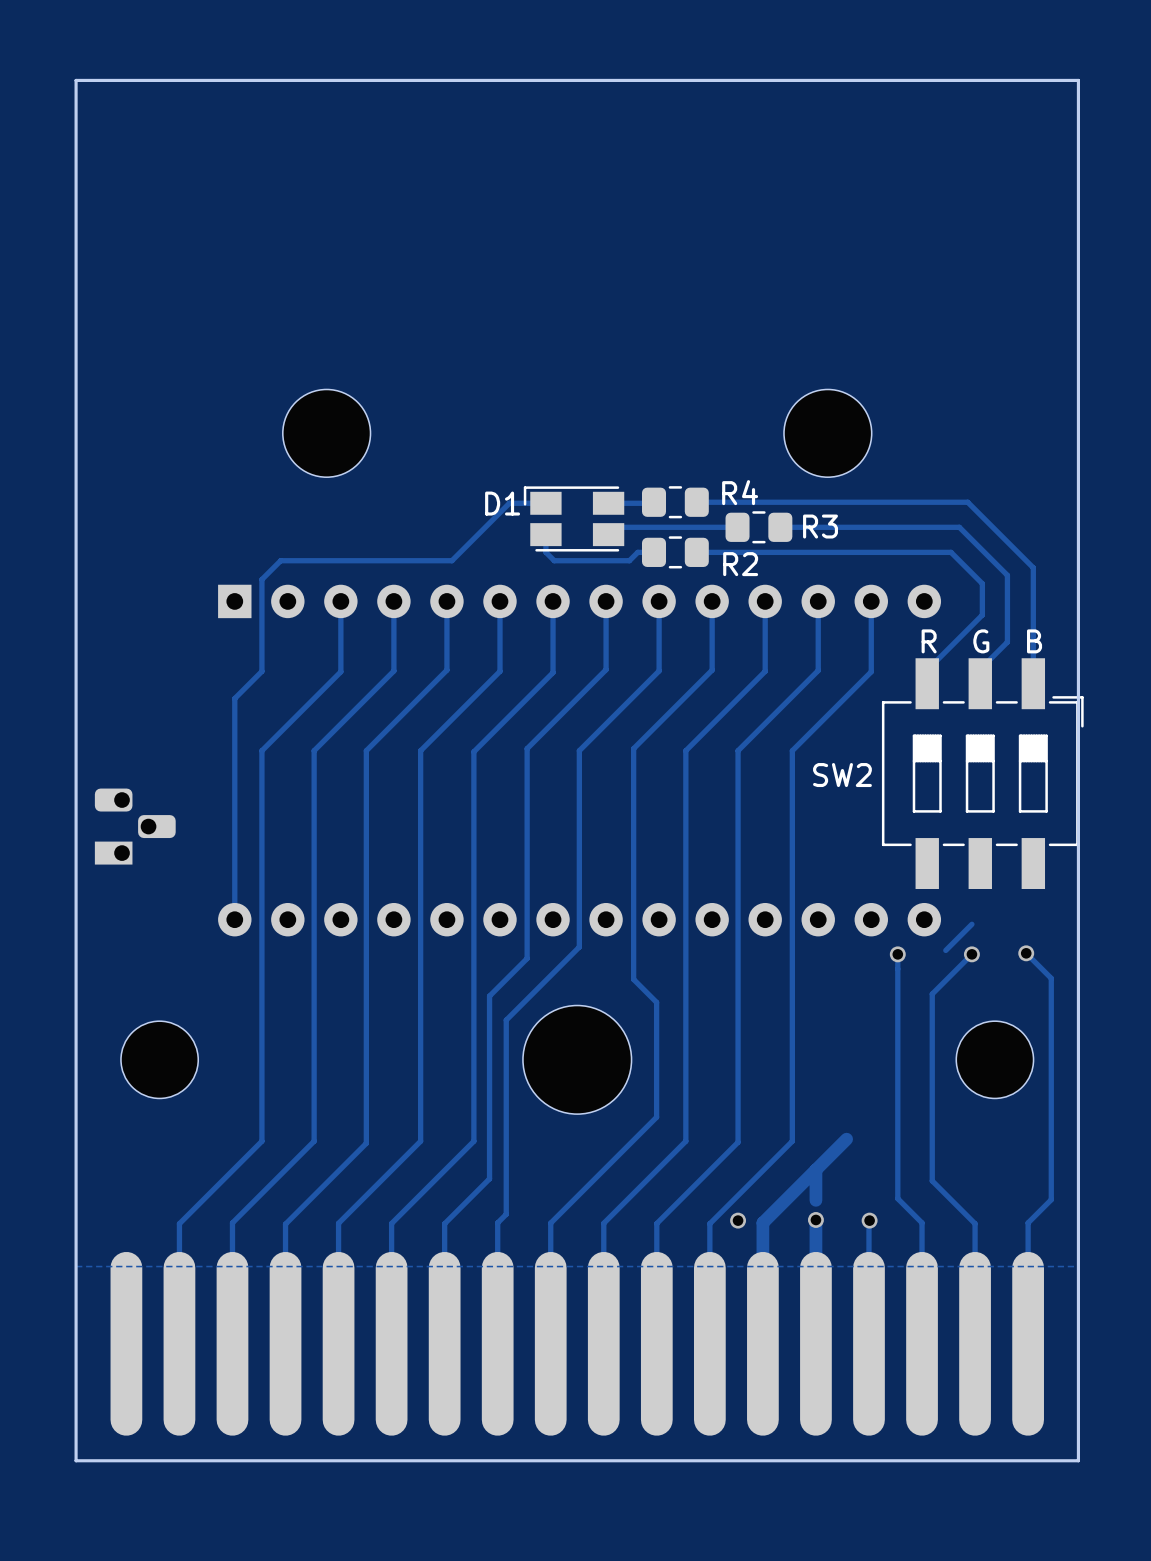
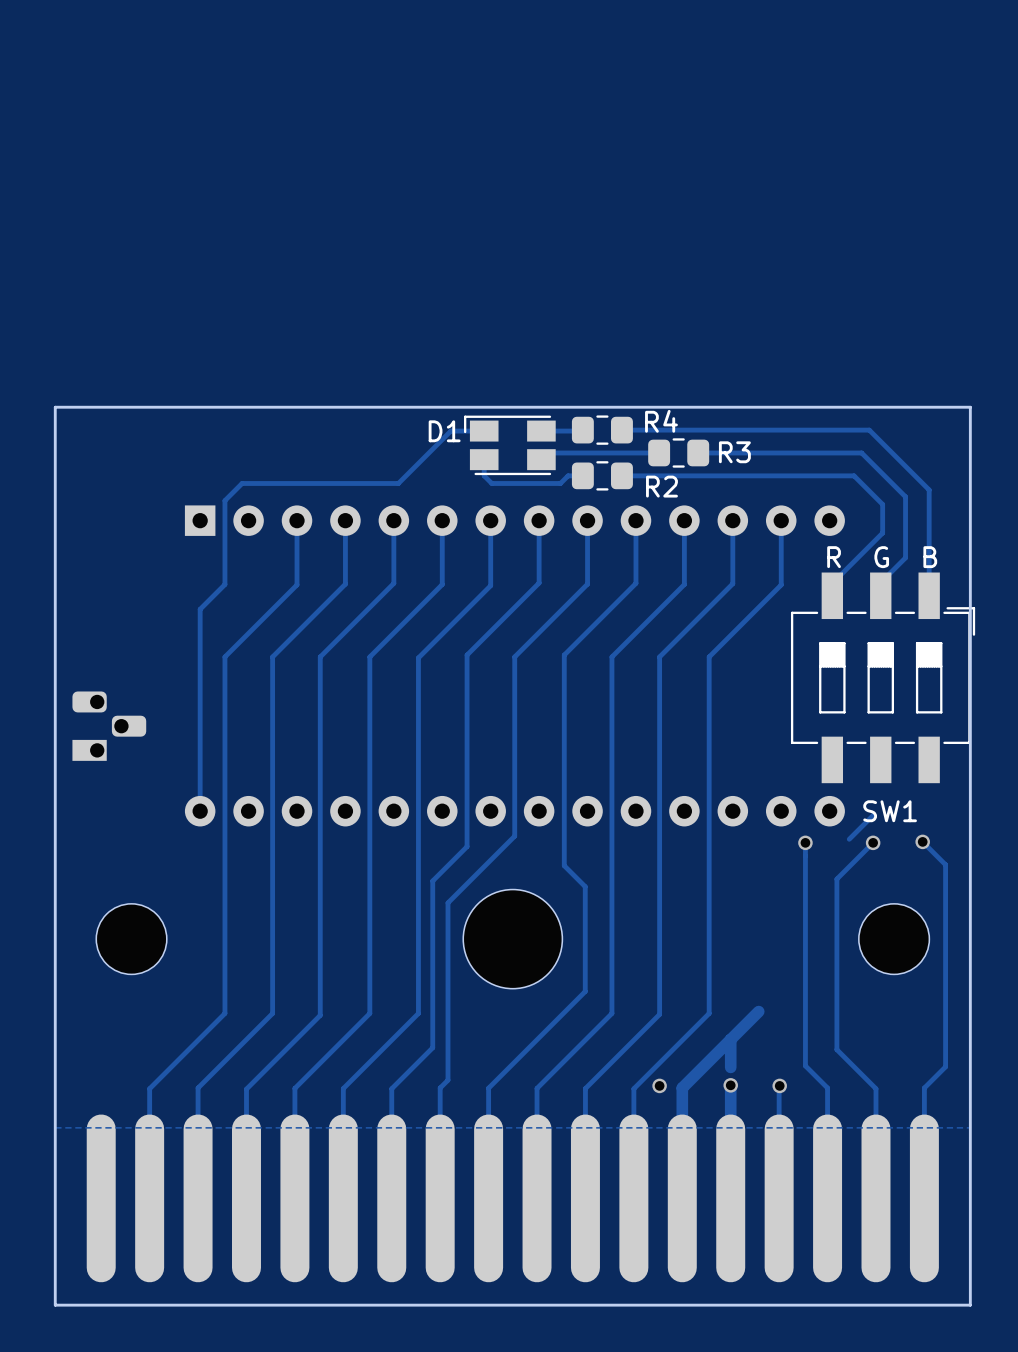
part: (326, 433) -> none
part: (827, 433) -> none
board edge: (1078, 477) (1078, 80) (76, 80) (76, 477) -> (970, 407) (55, 407)
SW2 name: SW2 (842, 775) -> SW1 (890, 811)

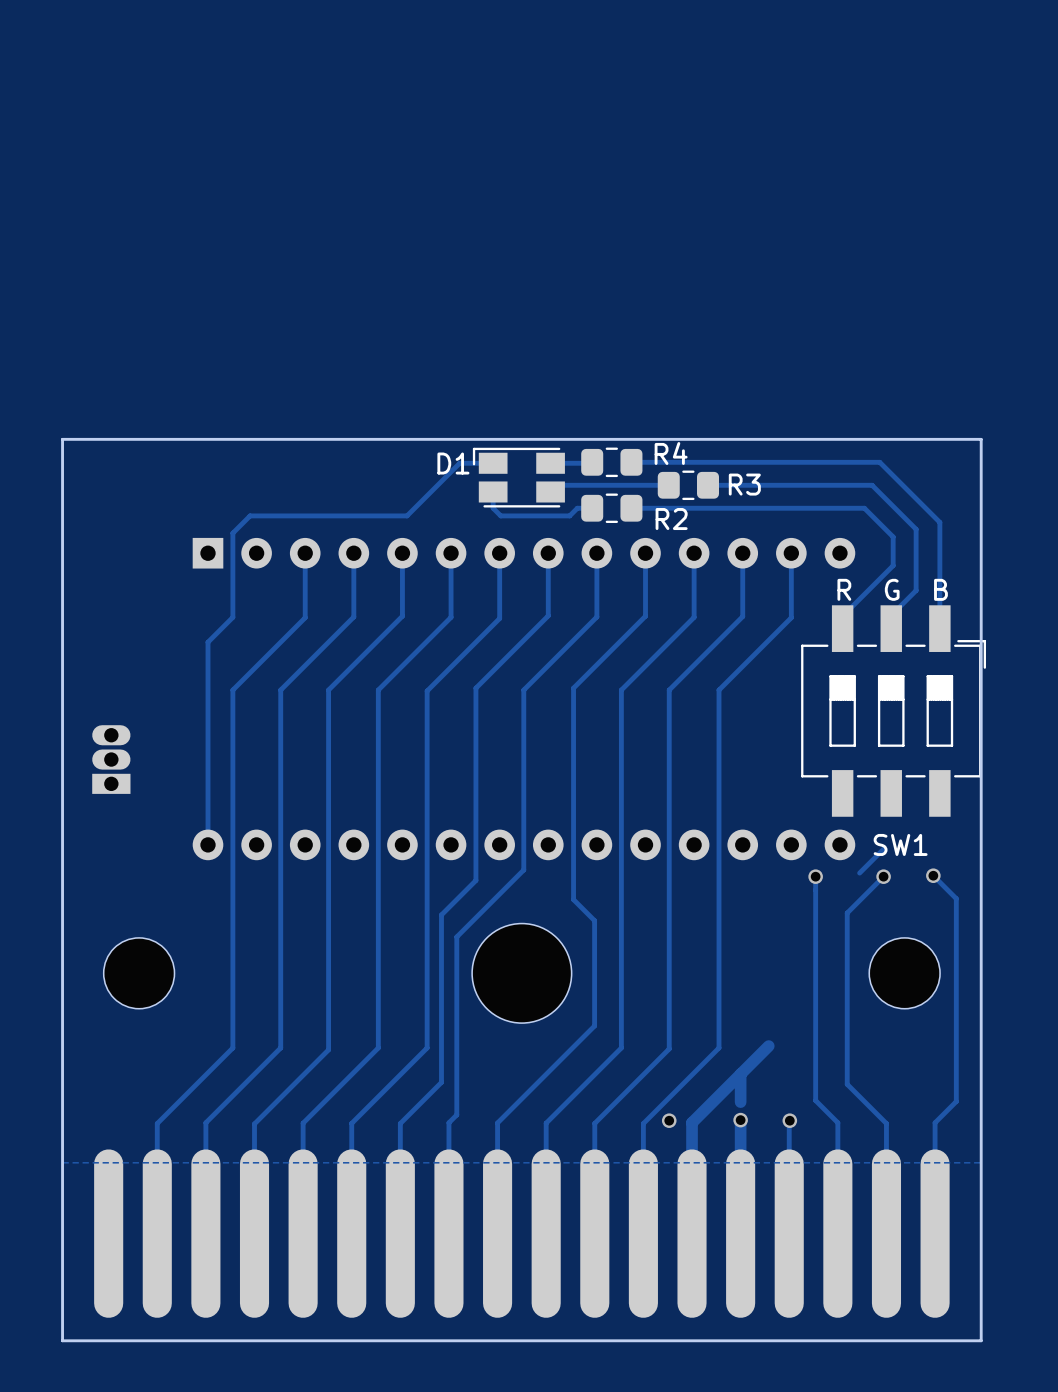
part footprint: [72, 691, 147, 761] -> [92, 725, 131, 794]

